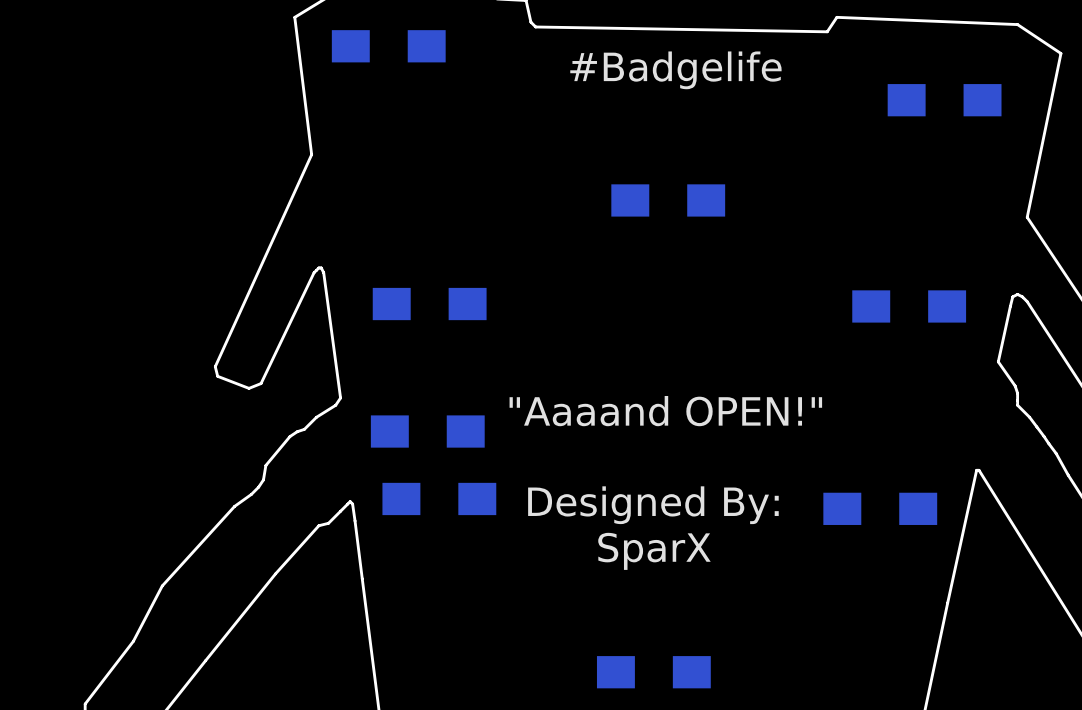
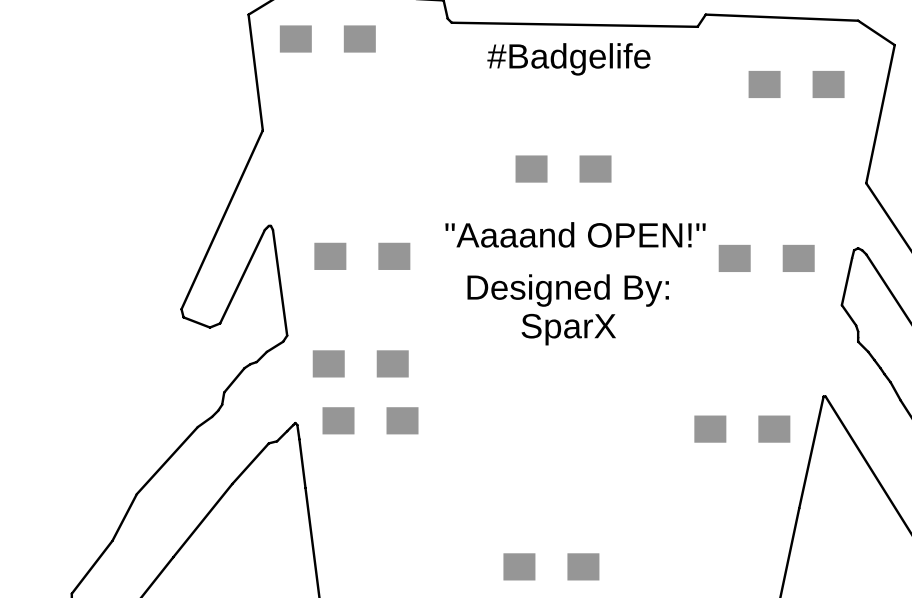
text position: "Aaaand OPEN!" (665, 411) -> "Aaaand OPEN!" (575, 234)
text position: Designed By: (653, 505) -> Designed By: (568, 290)
text position: SparX (654, 551) -> SparX (568, 329)

